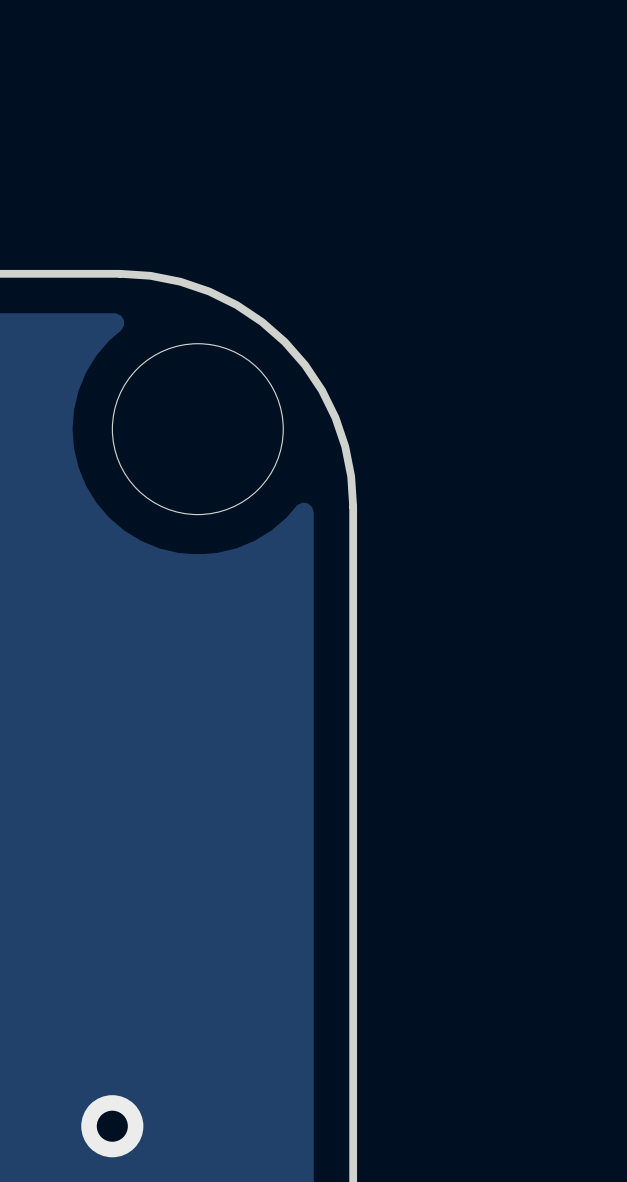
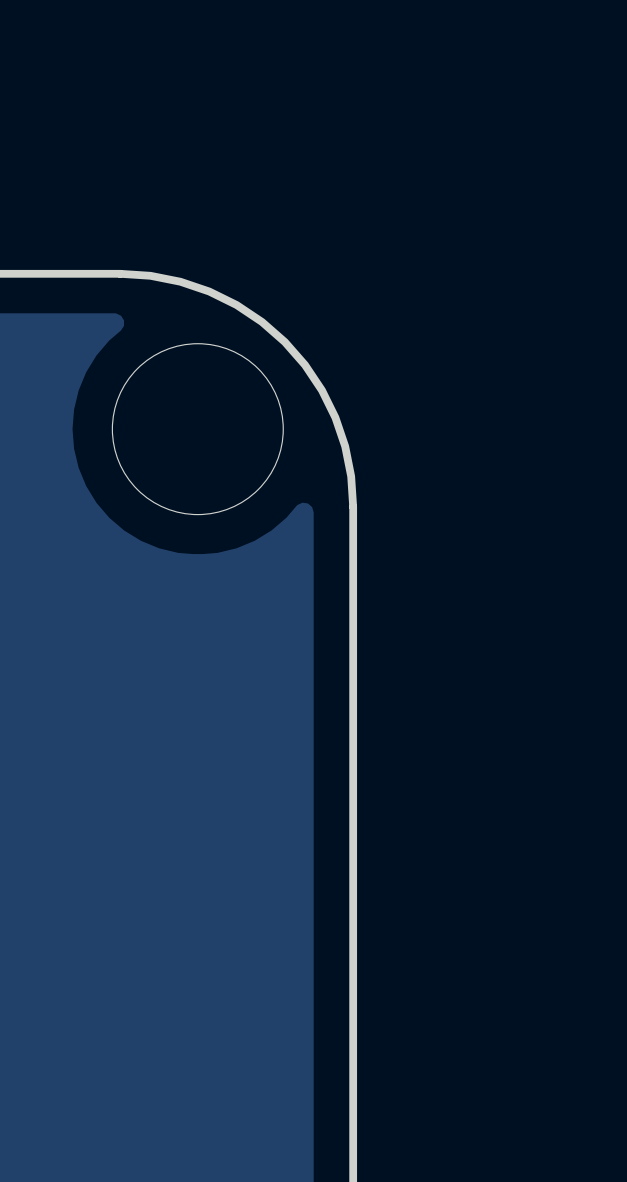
via: (112, 1126) -> none

